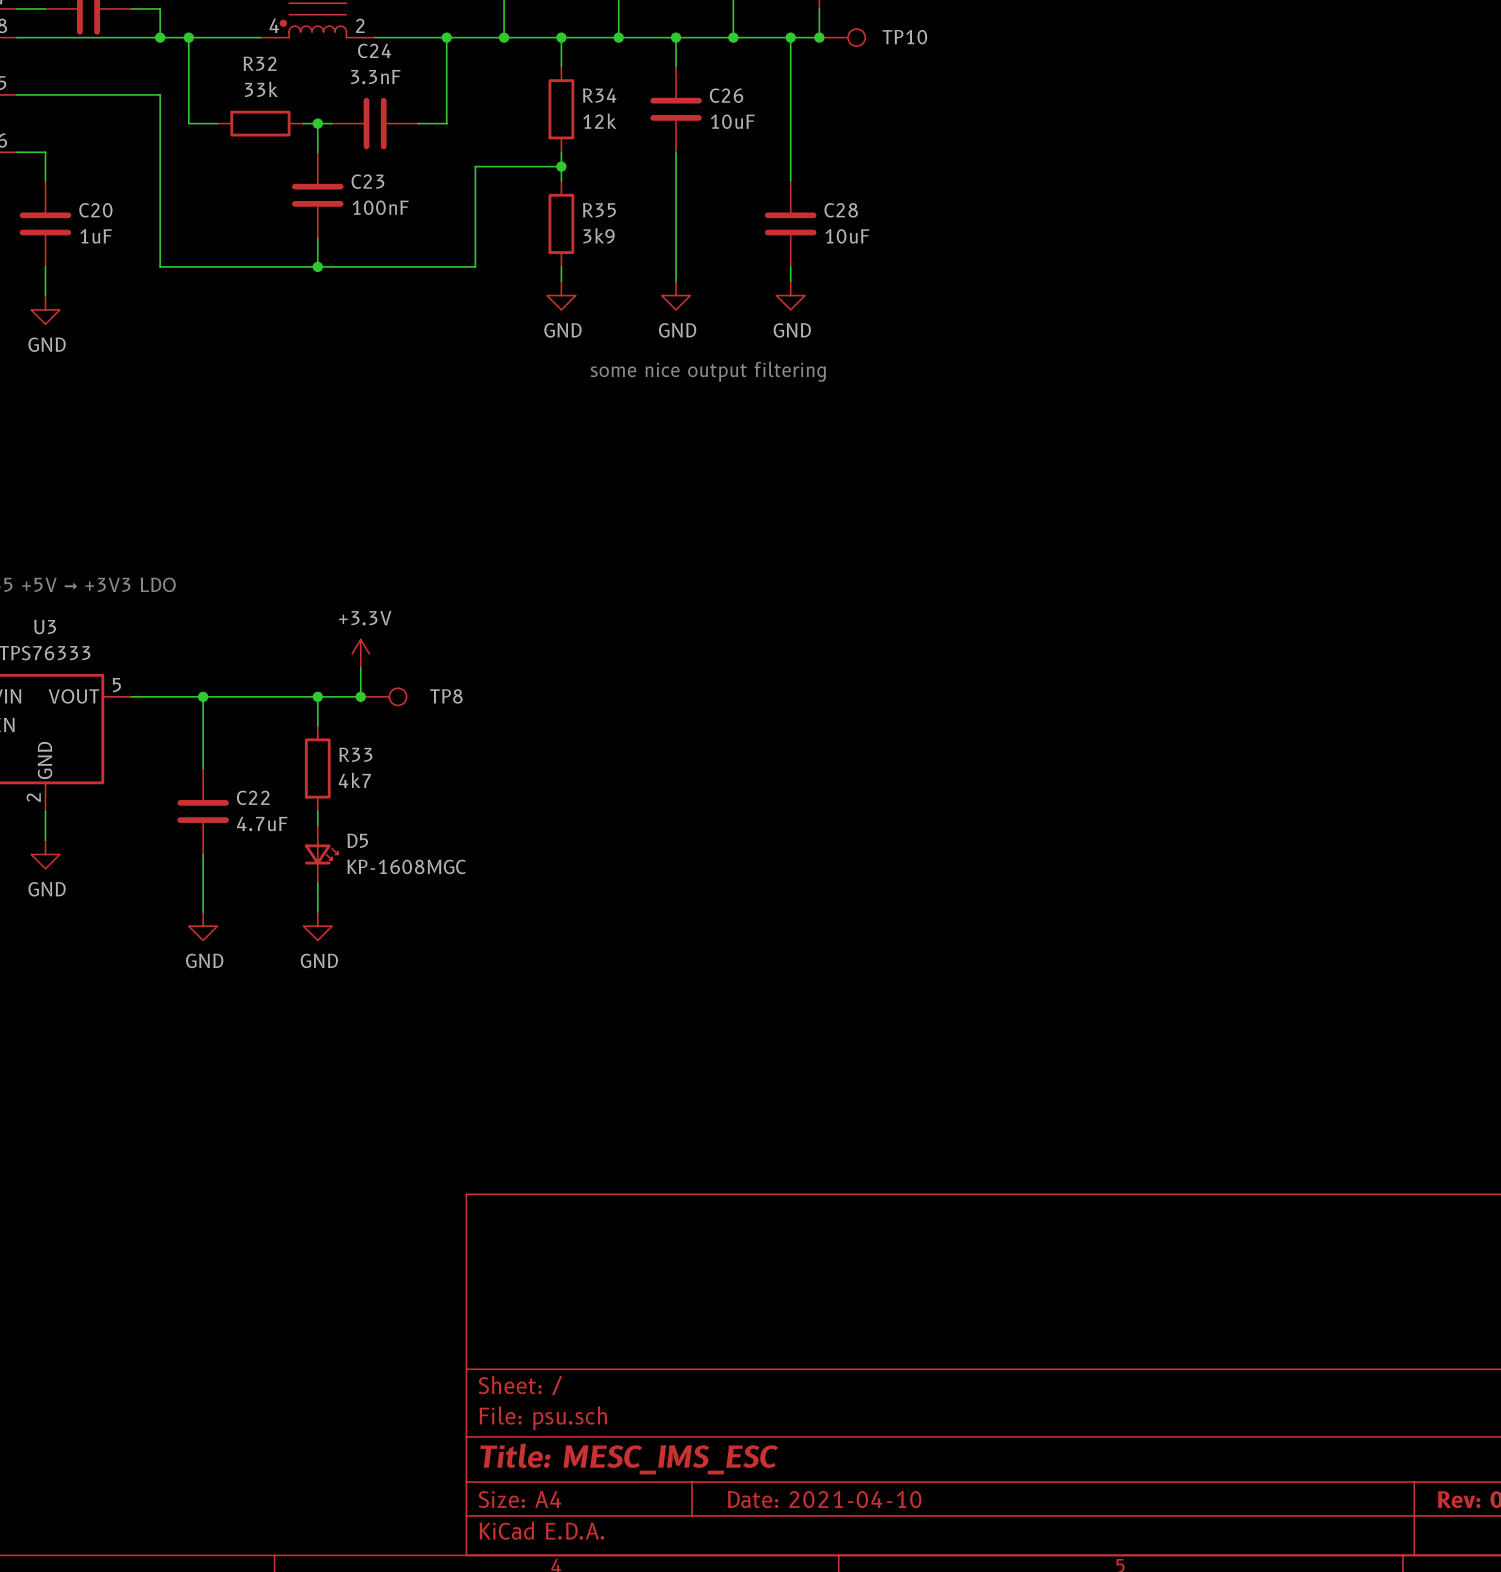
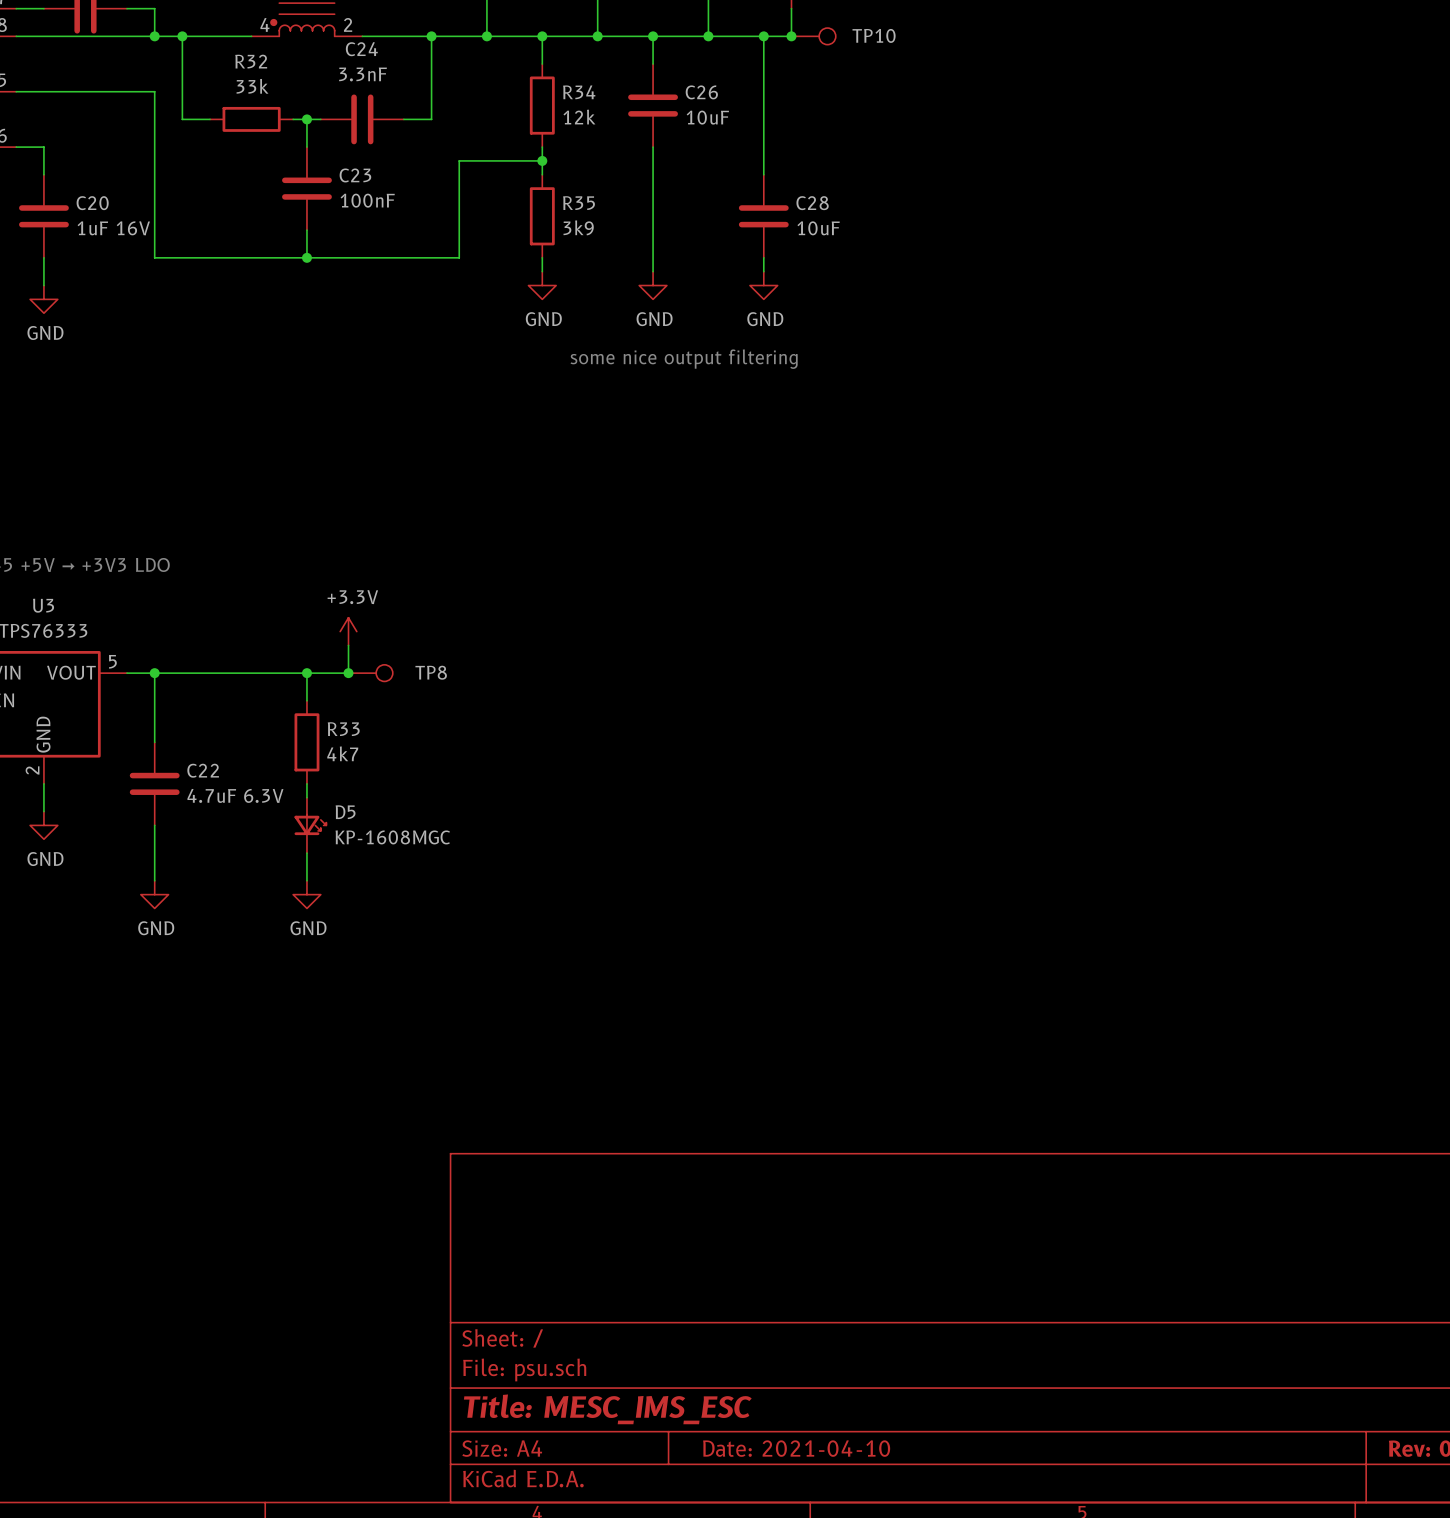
C20 value: 1uF (96, 236) -> 1uF 16V (113, 228)
wire: (203, 696) (203, 768) -> (154, 673) (154, 742)
junction position: (203, 696) -> (154, 673)
C22 position: (203, 811) -> (154, 783)
C22 value: 4.7uF (262, 823) -> 4.7uF 6.3V (235, 795)
wire: (203, 854) (203, 911) -> (154, 825) (154, 880)
power symbol position: GND (203, 926) -> GND (154, 894)

